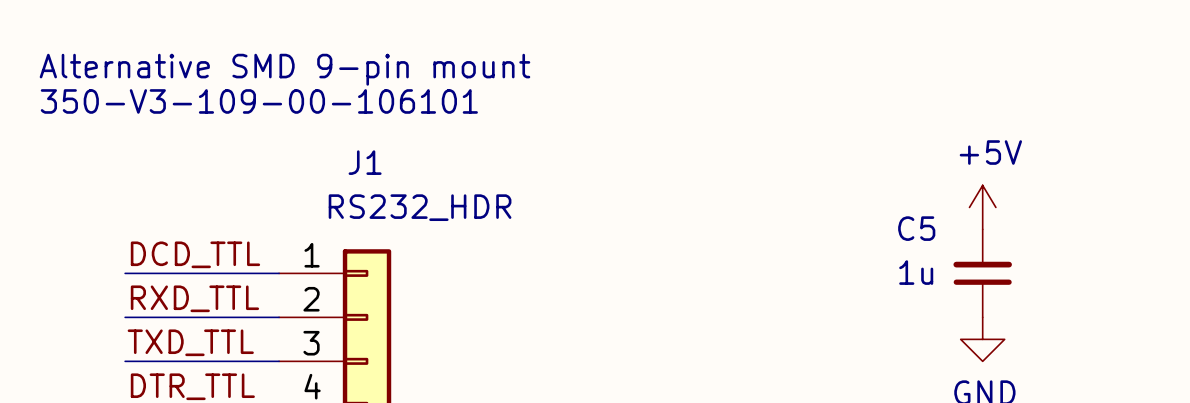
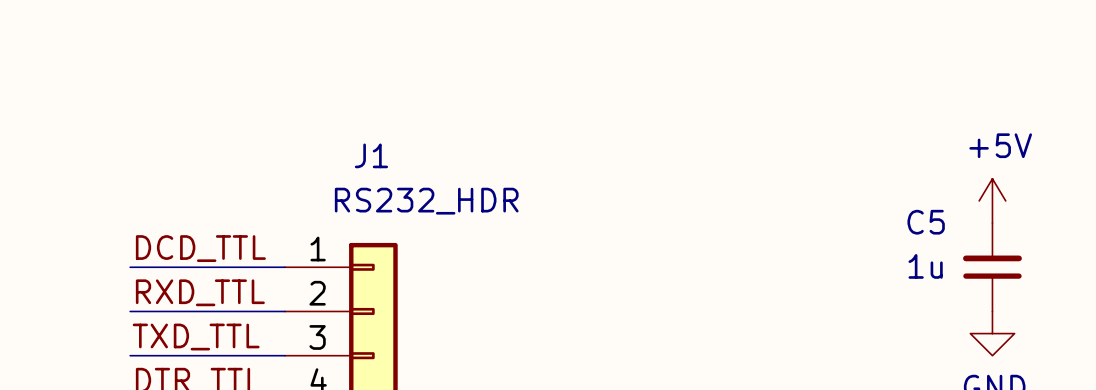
text: Alternative SMD 9-pin mount (284, 69) -> none
text: 350-V3-109-00-106101 (259, 101) -> none

